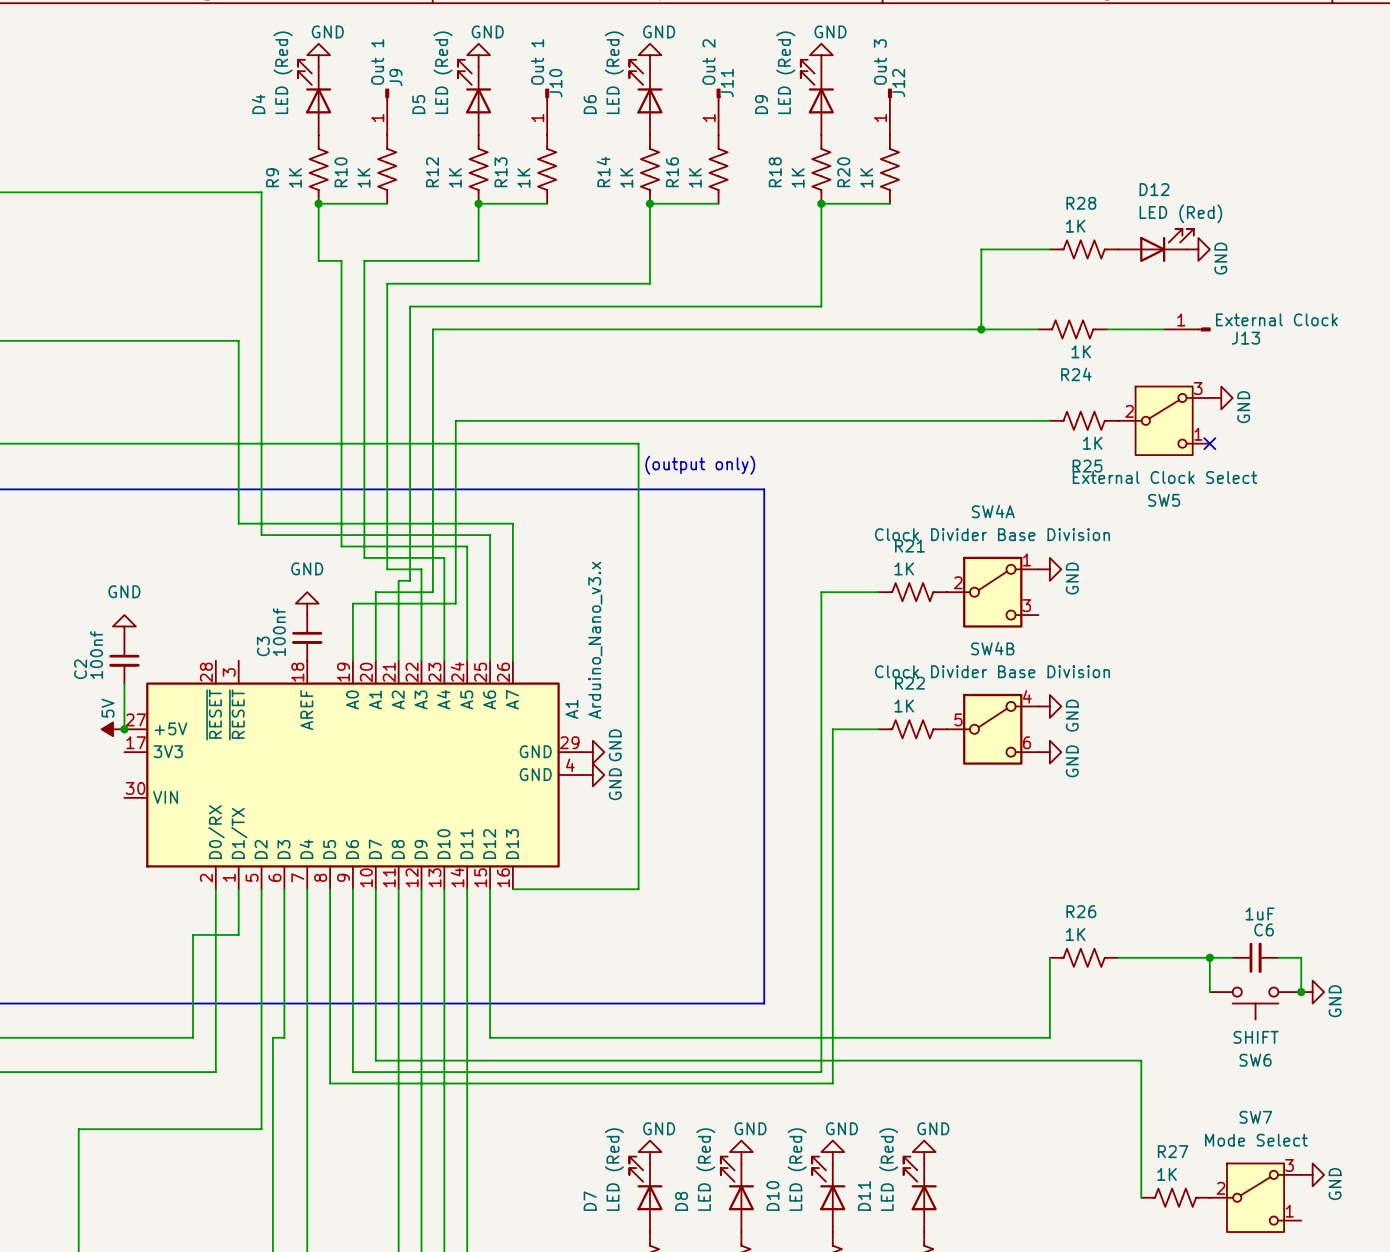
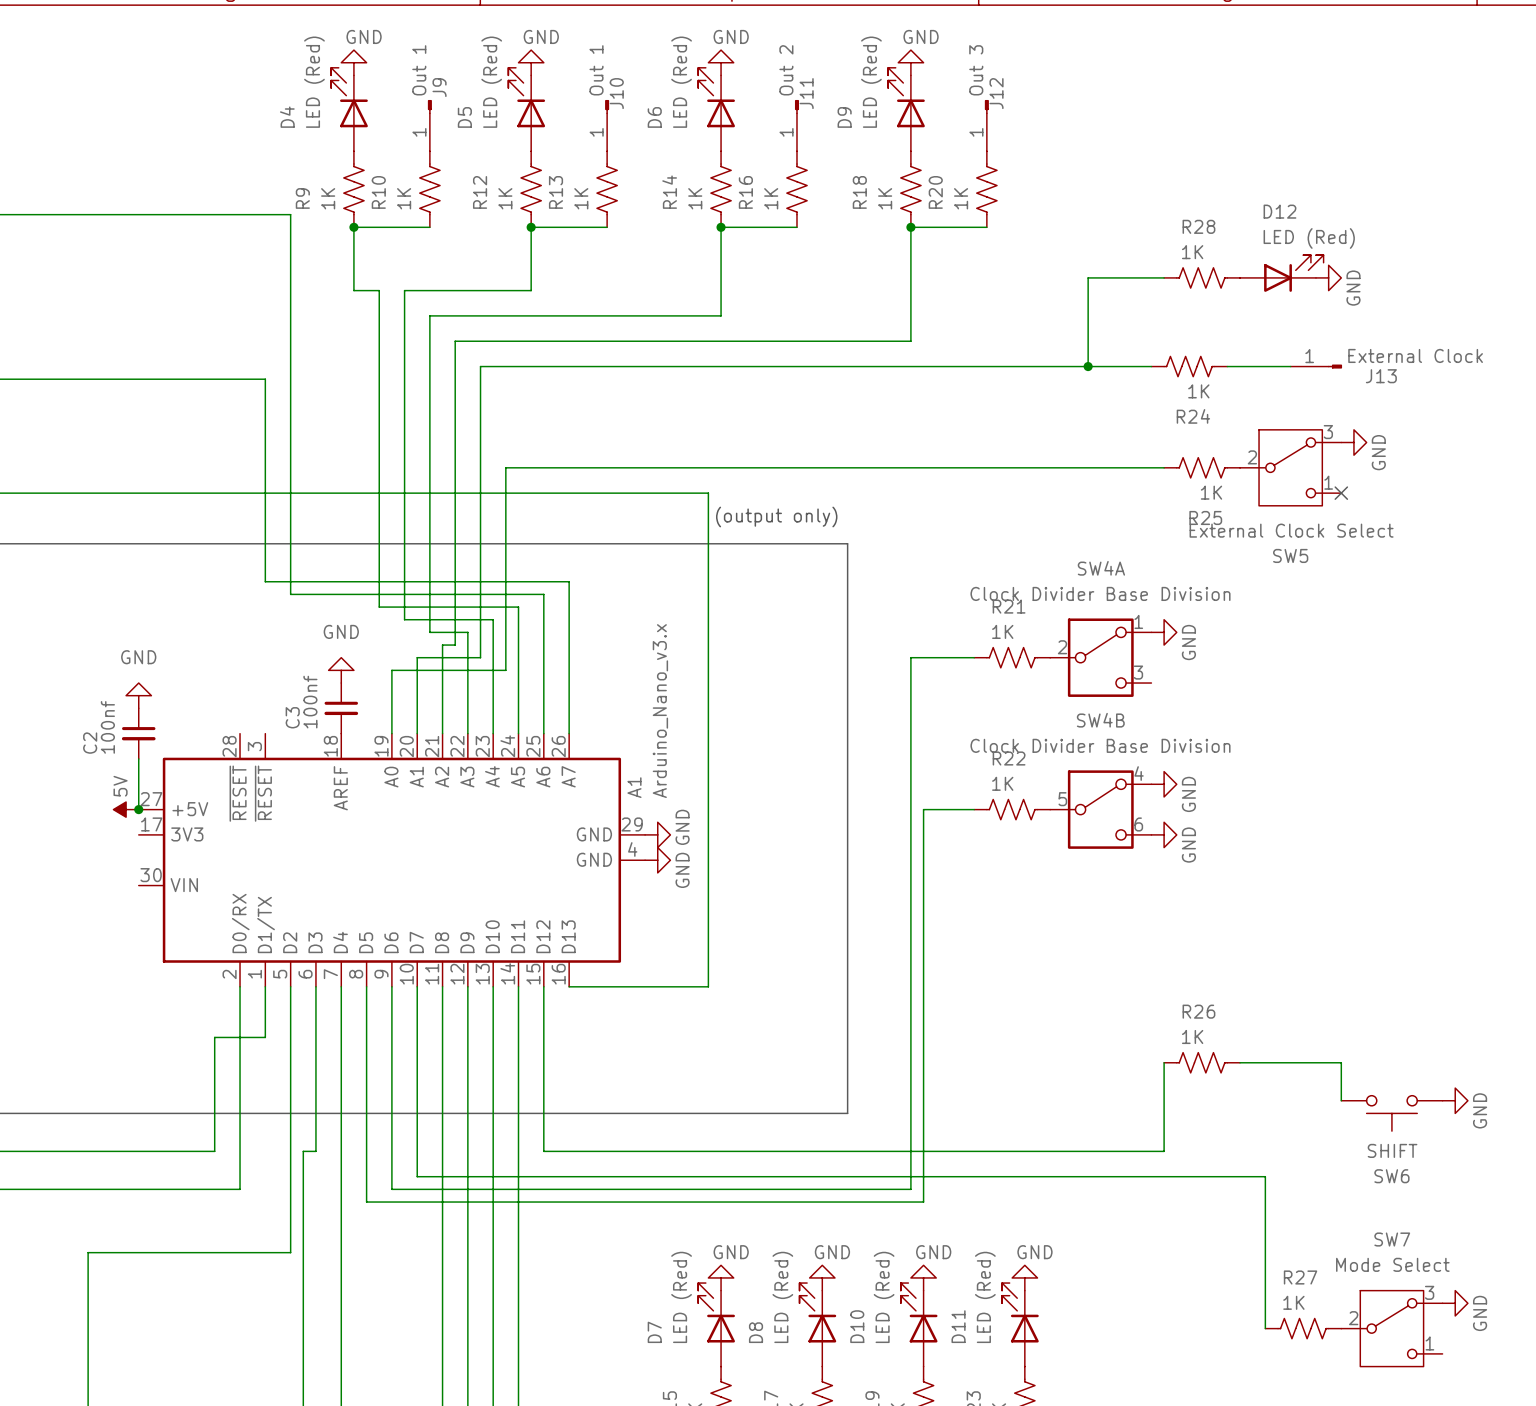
wire: (1209, 957) (1232, 957) -> none
junction: (1209, 957) -> none
C6: 1uF (1255, 957) -> none
wire: (1278, 957) (1301, 957) (1301, 992) -> none
junction: (1301, 992) -> none

